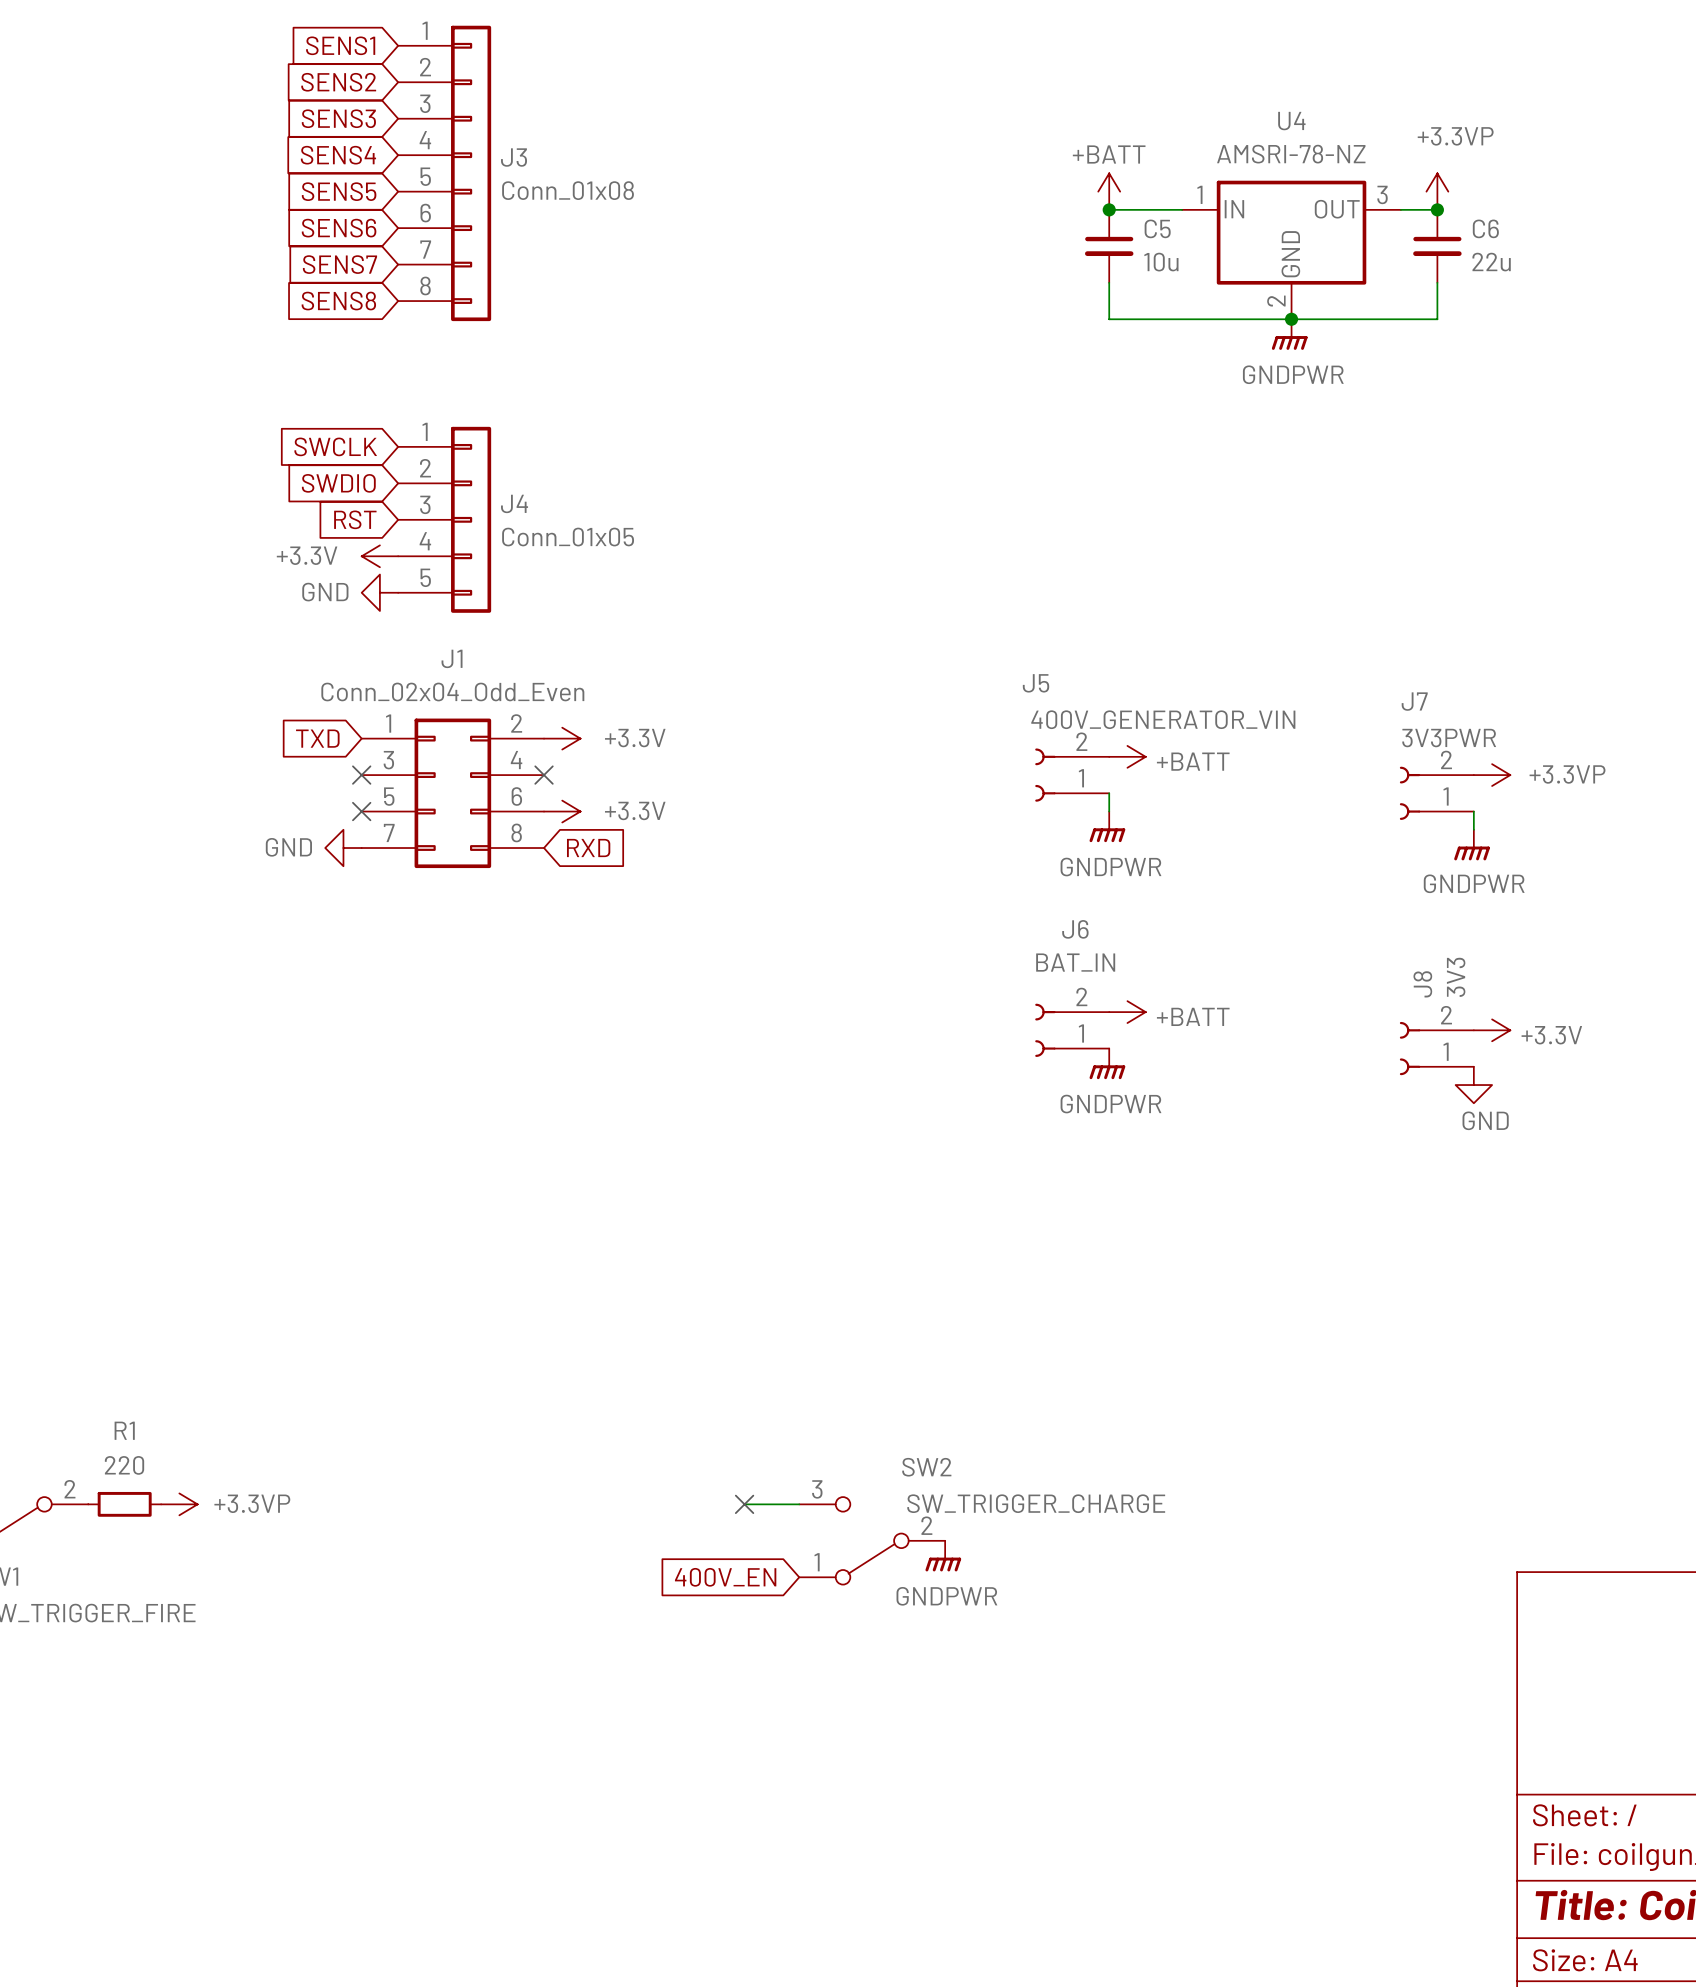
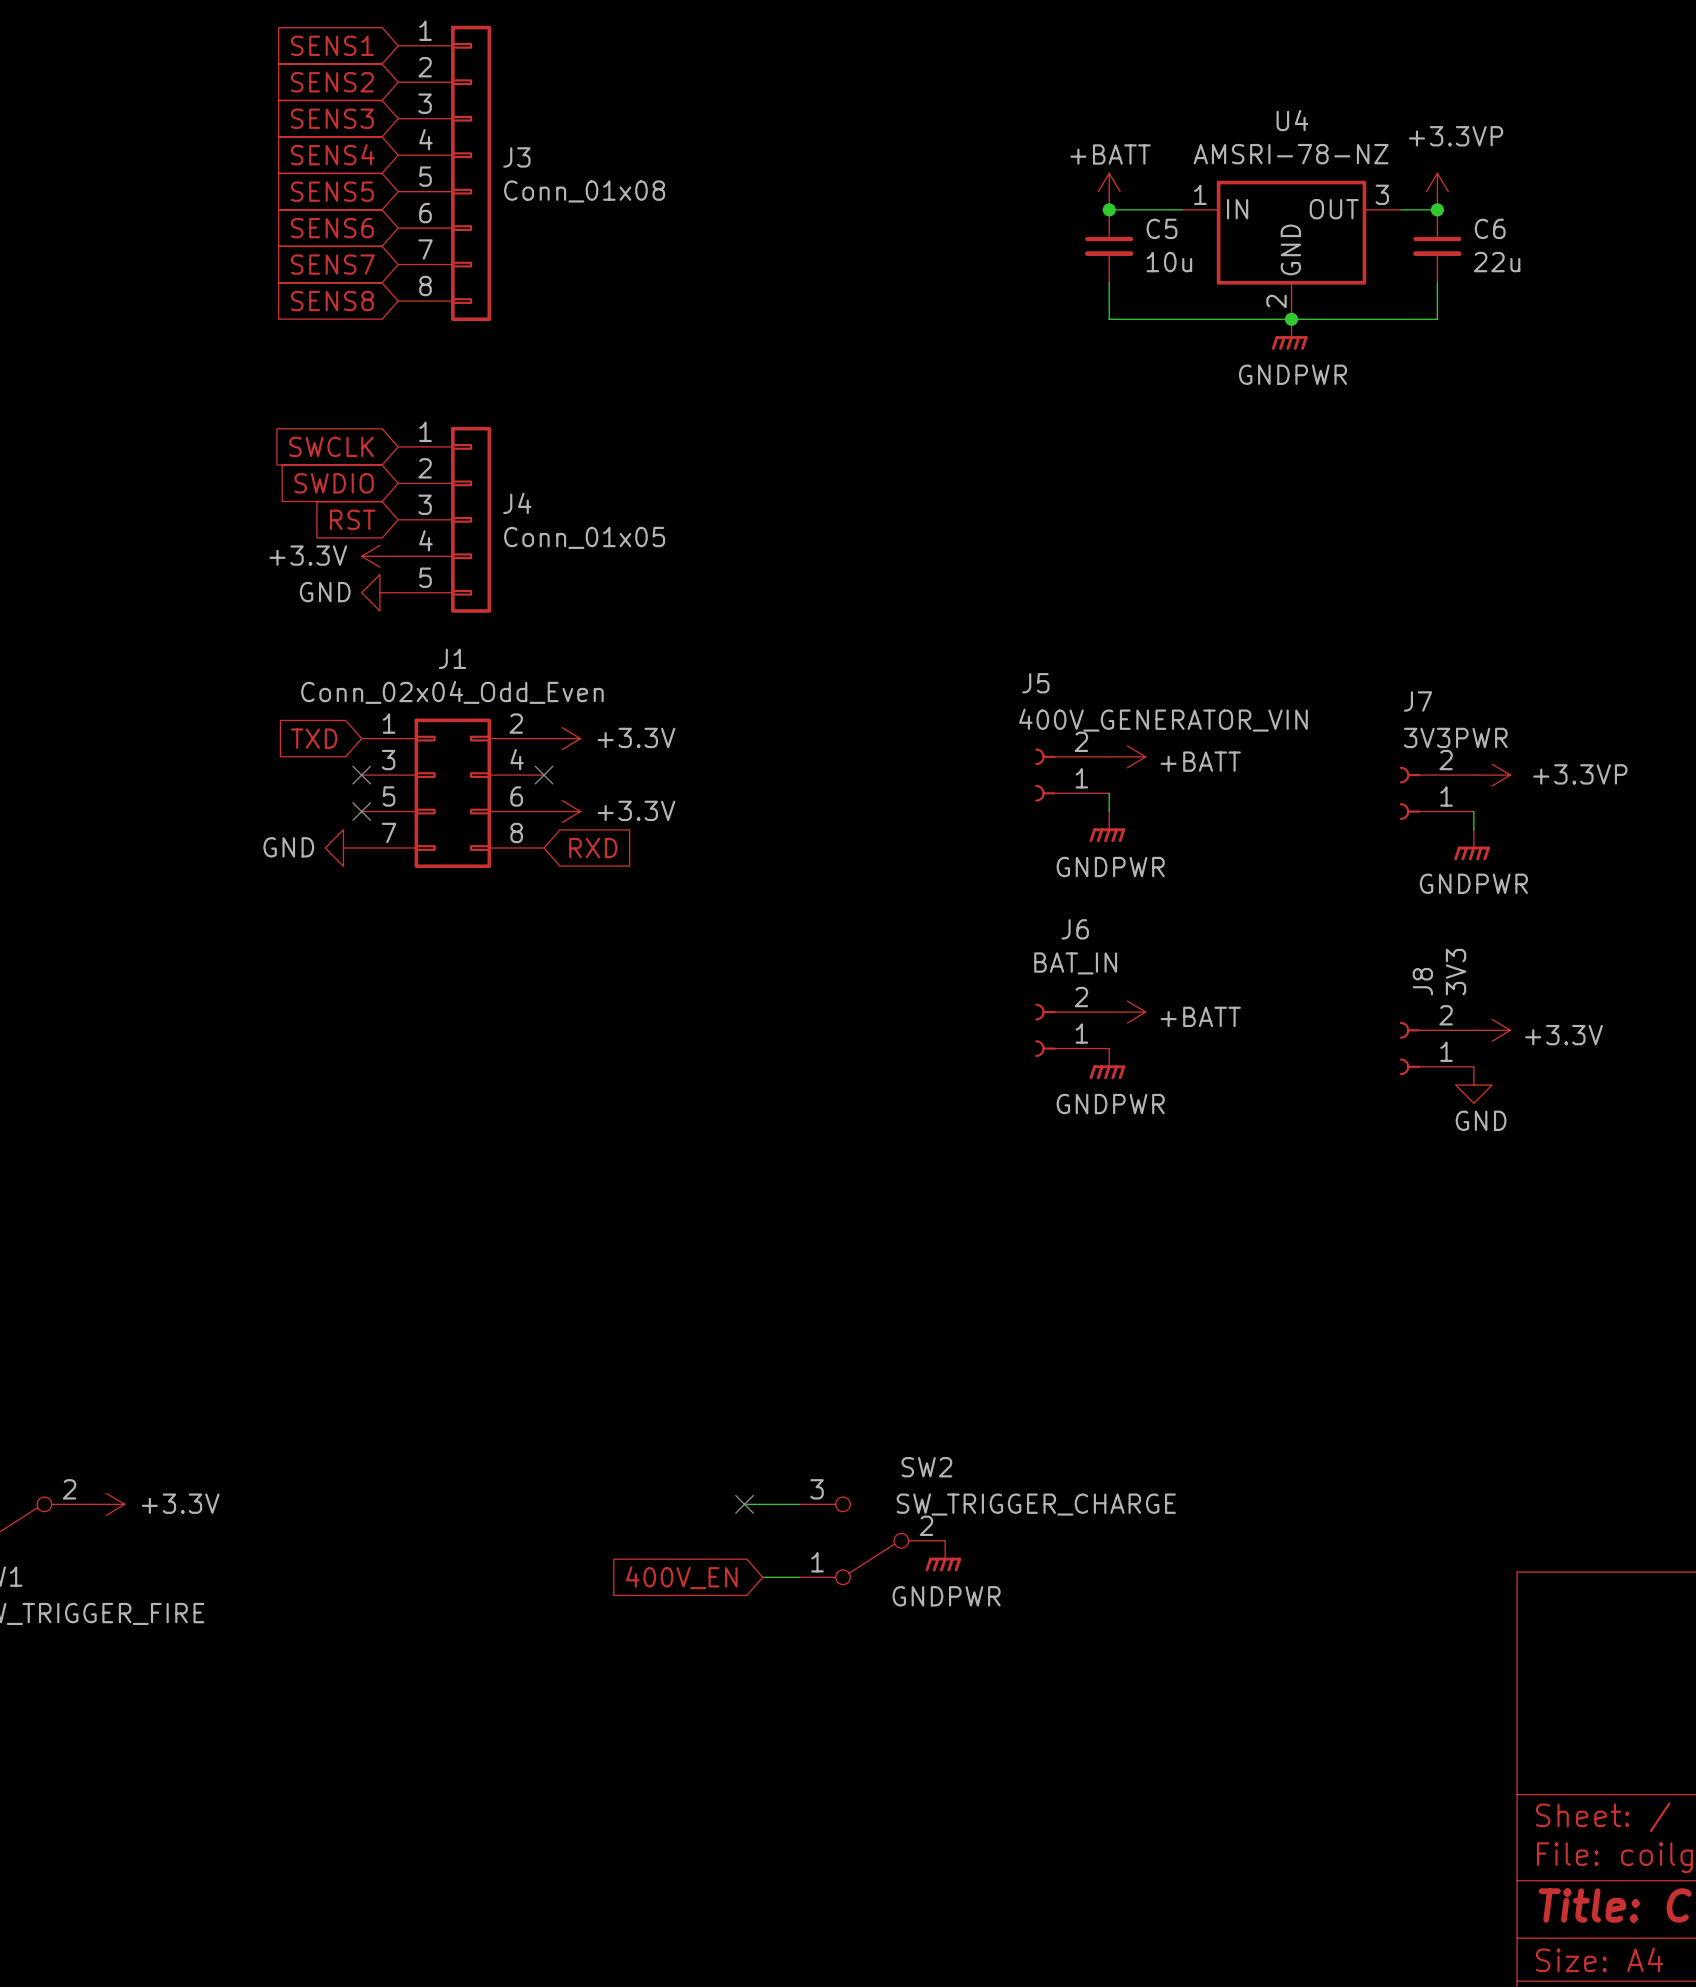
power symbol: none -> +3.3V (106, 1504)
R1: 220 (124, 1504) -> none
power symbol: +3.3VP (179, 1504) -> none
global label position: 400V_EN (725, 1577) -> 400V_EN (681, 1577)
wire: none -> (762, 1577) (799, 1577)

